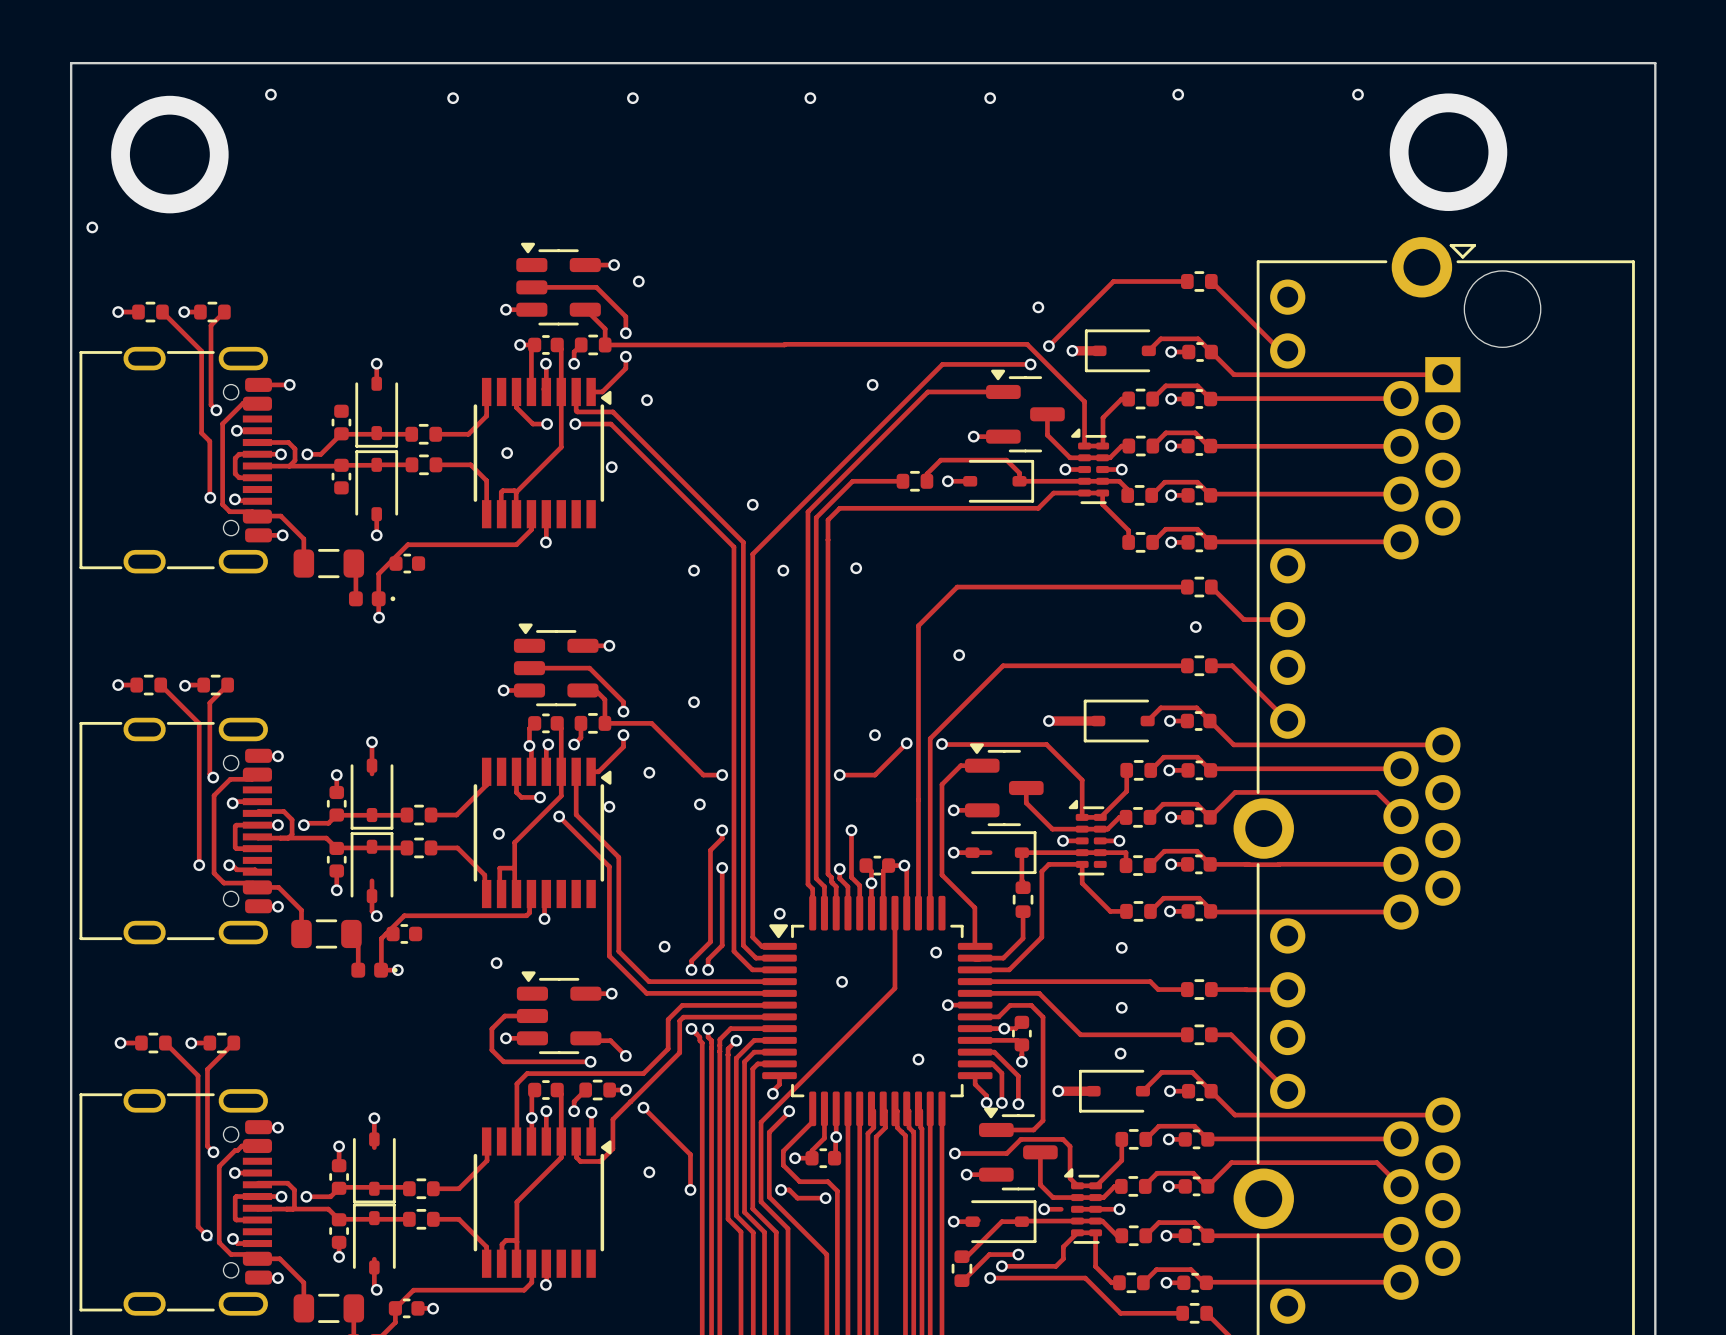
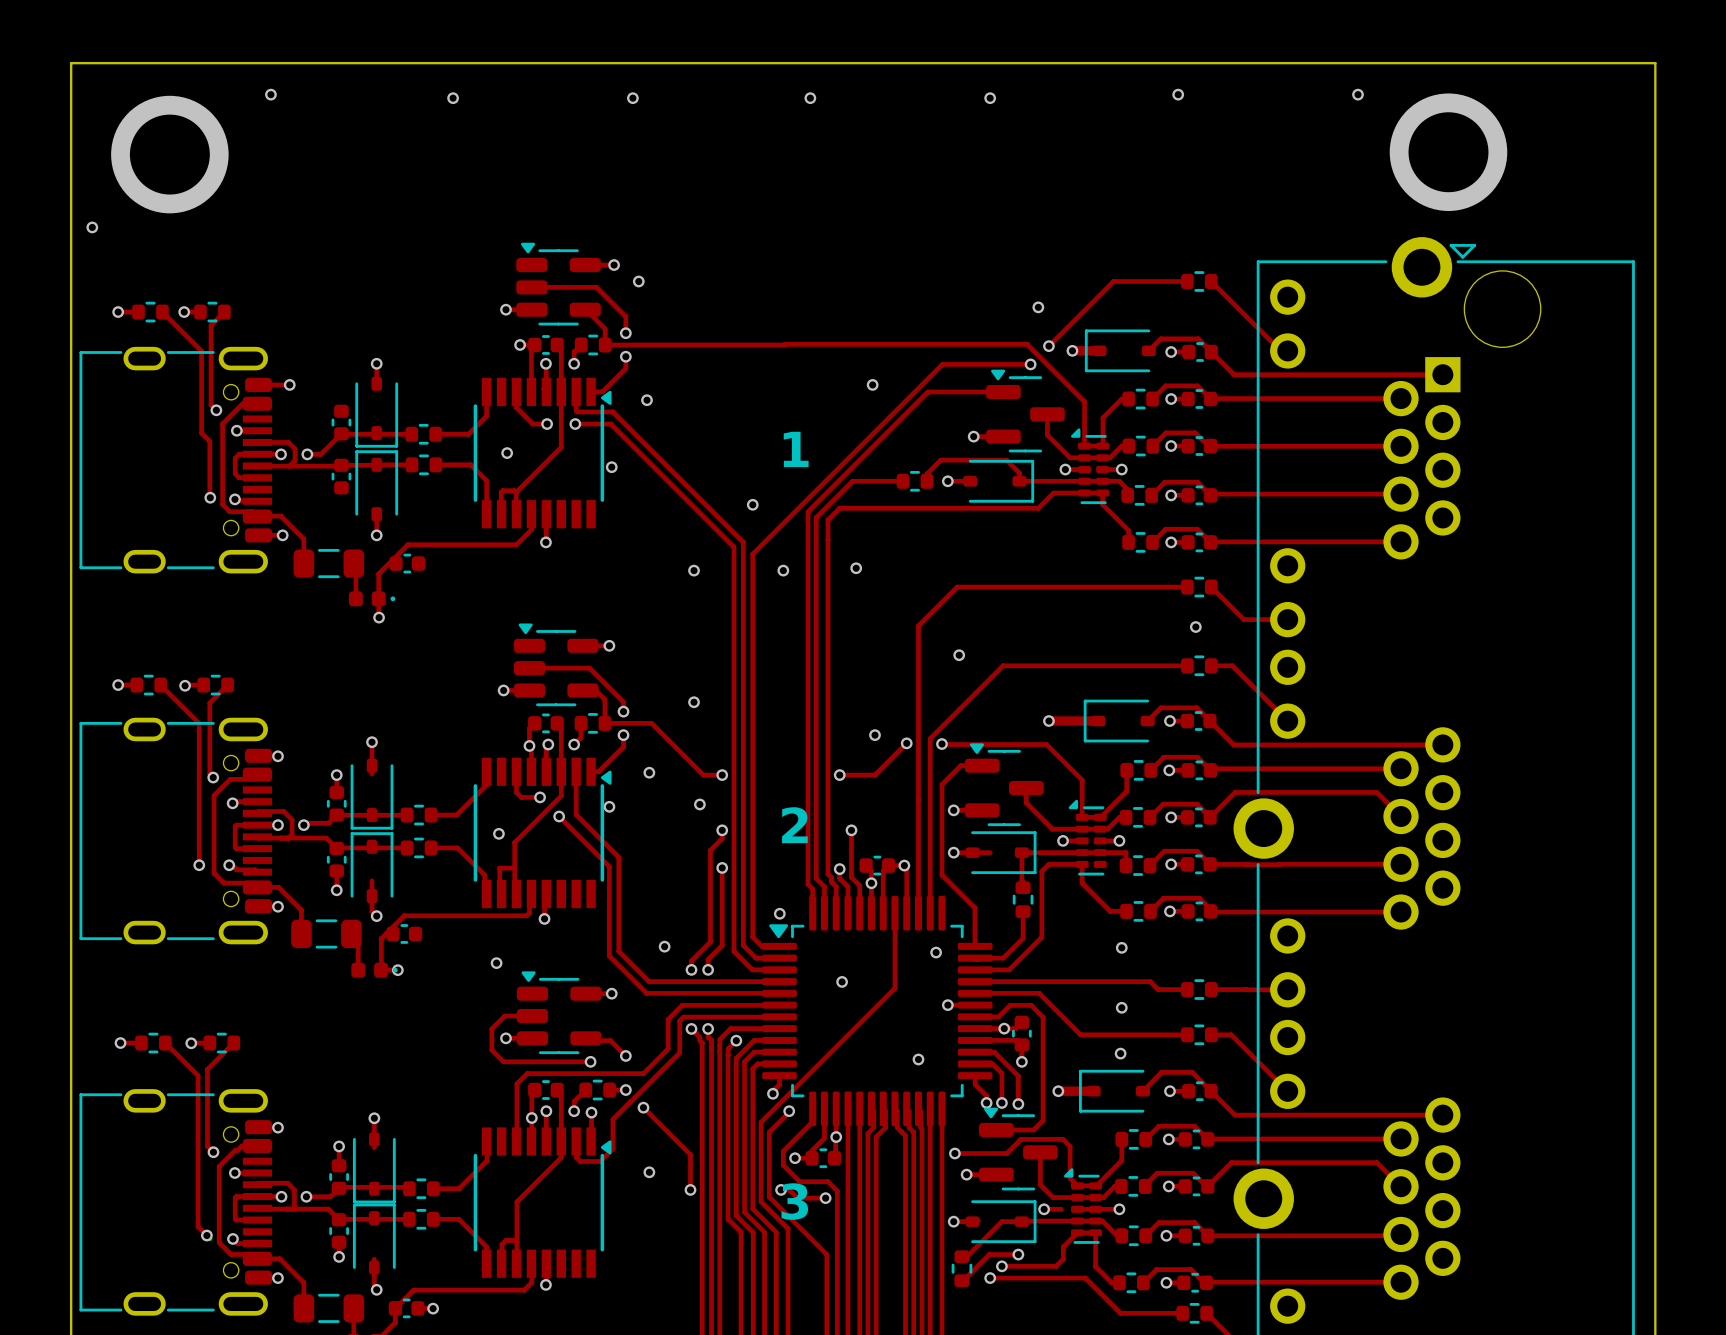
text: none -> 1 (796, 449)
text: none -> 2 (794, 825)
text: none -> 3 (794, 1201)

